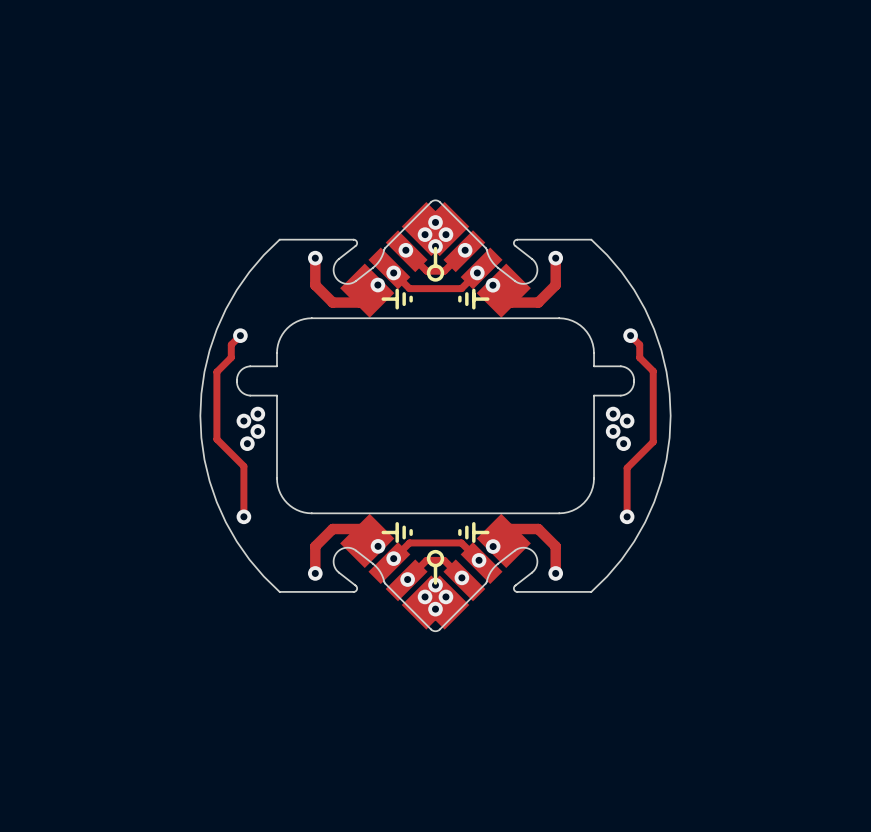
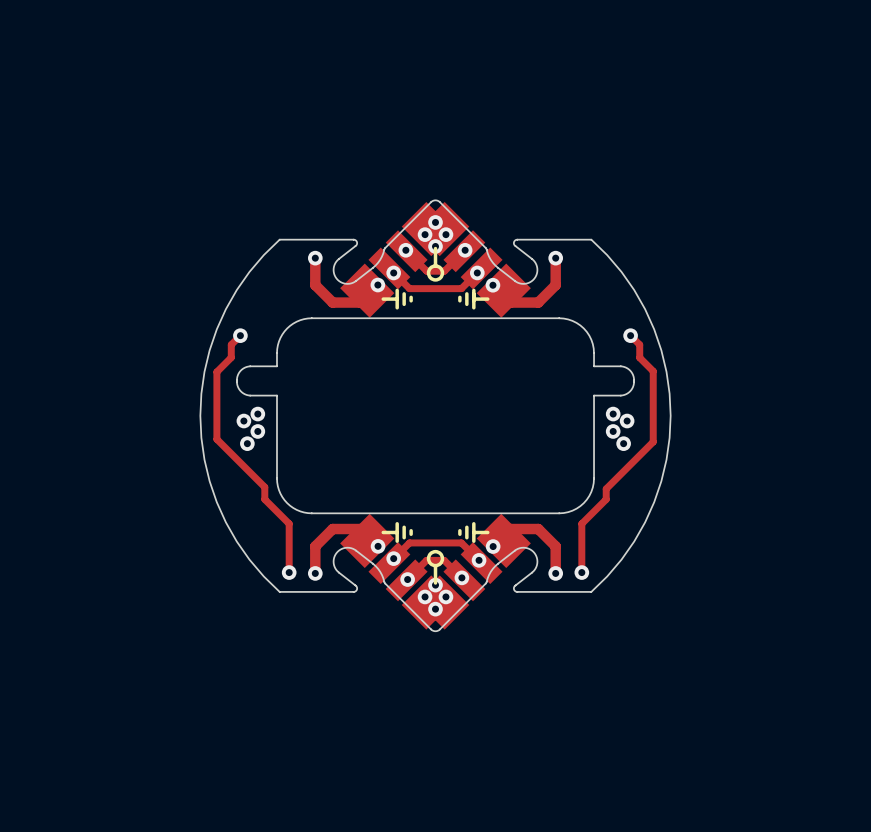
track: (243, 466) (243, 516) -> (243, 466) (264, 487) (264, 499) (289, 523) (289, 572)
track: (627, 468) (627, 516) -> (627, 468) (606, 488) (606, 499) (581, 523) (581, 572)
via position: (243, 516) -> (289, 572)
via position: (627, 516) -> (581, 572)

